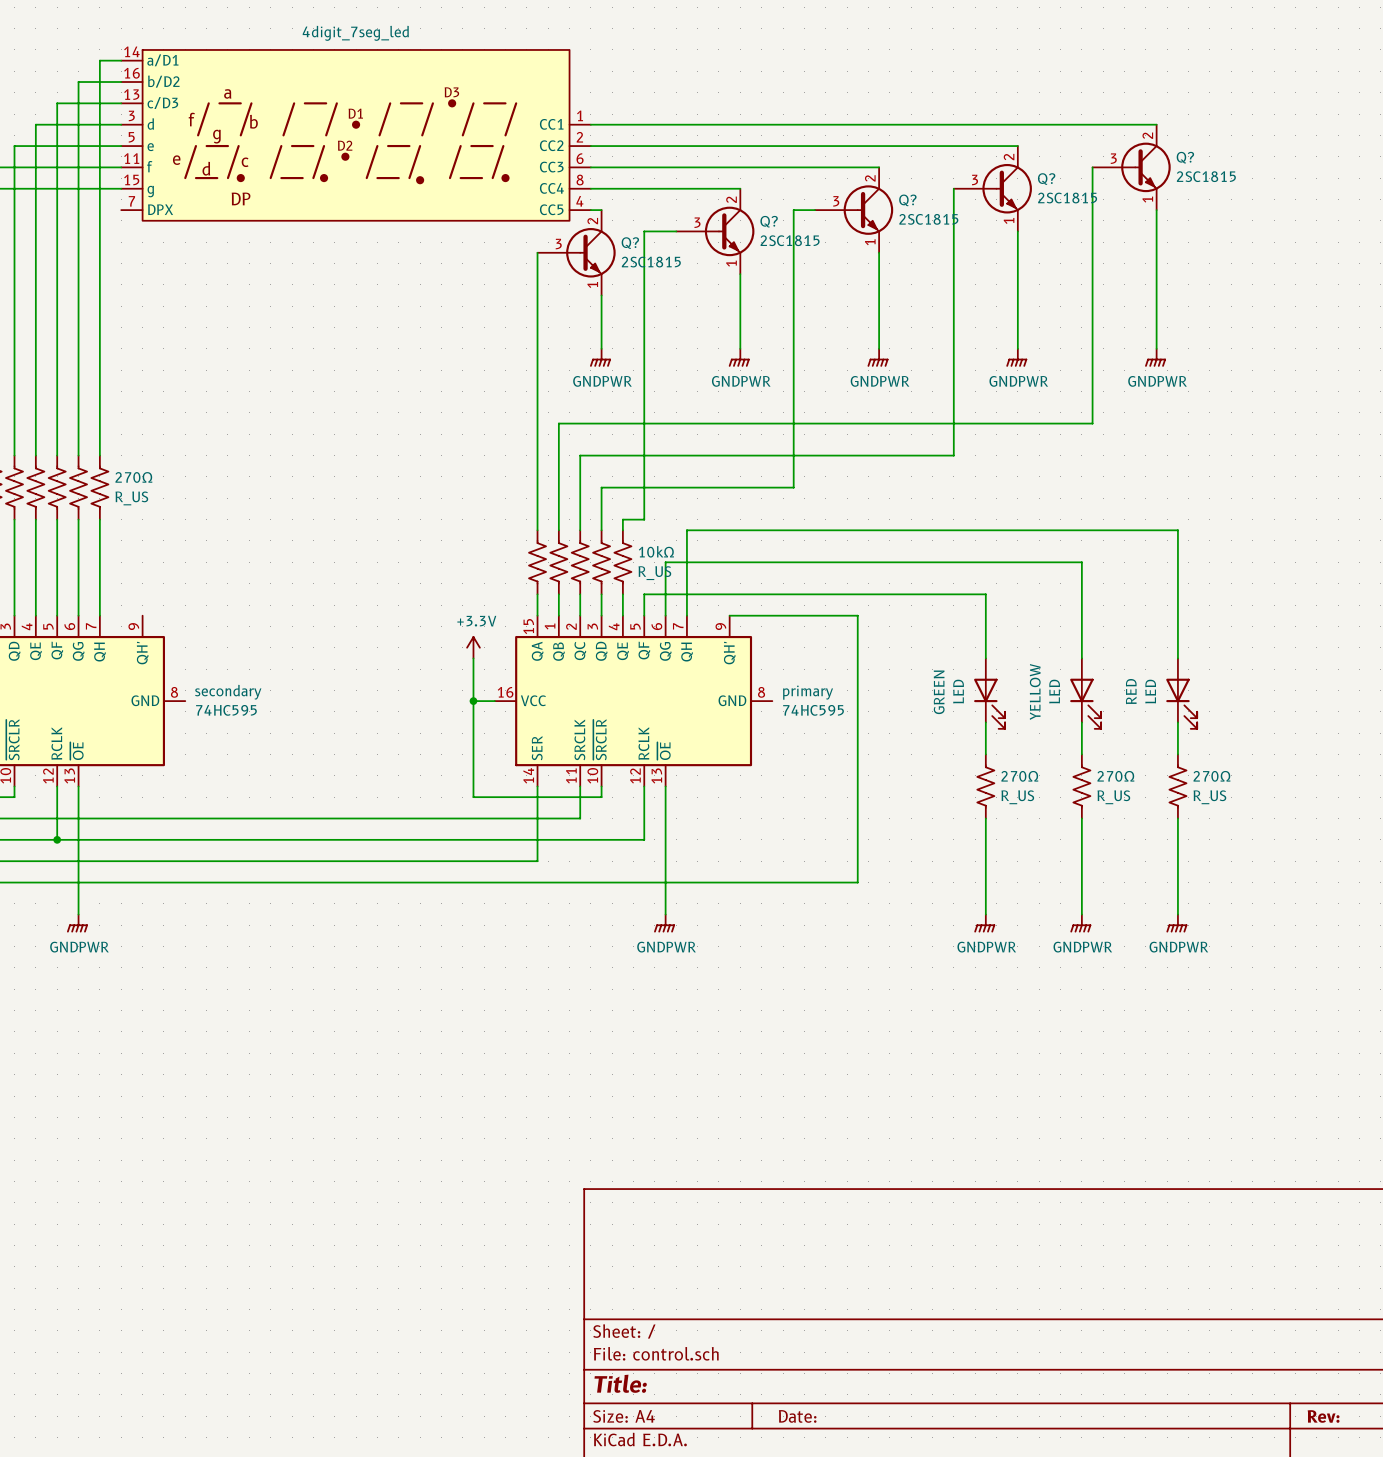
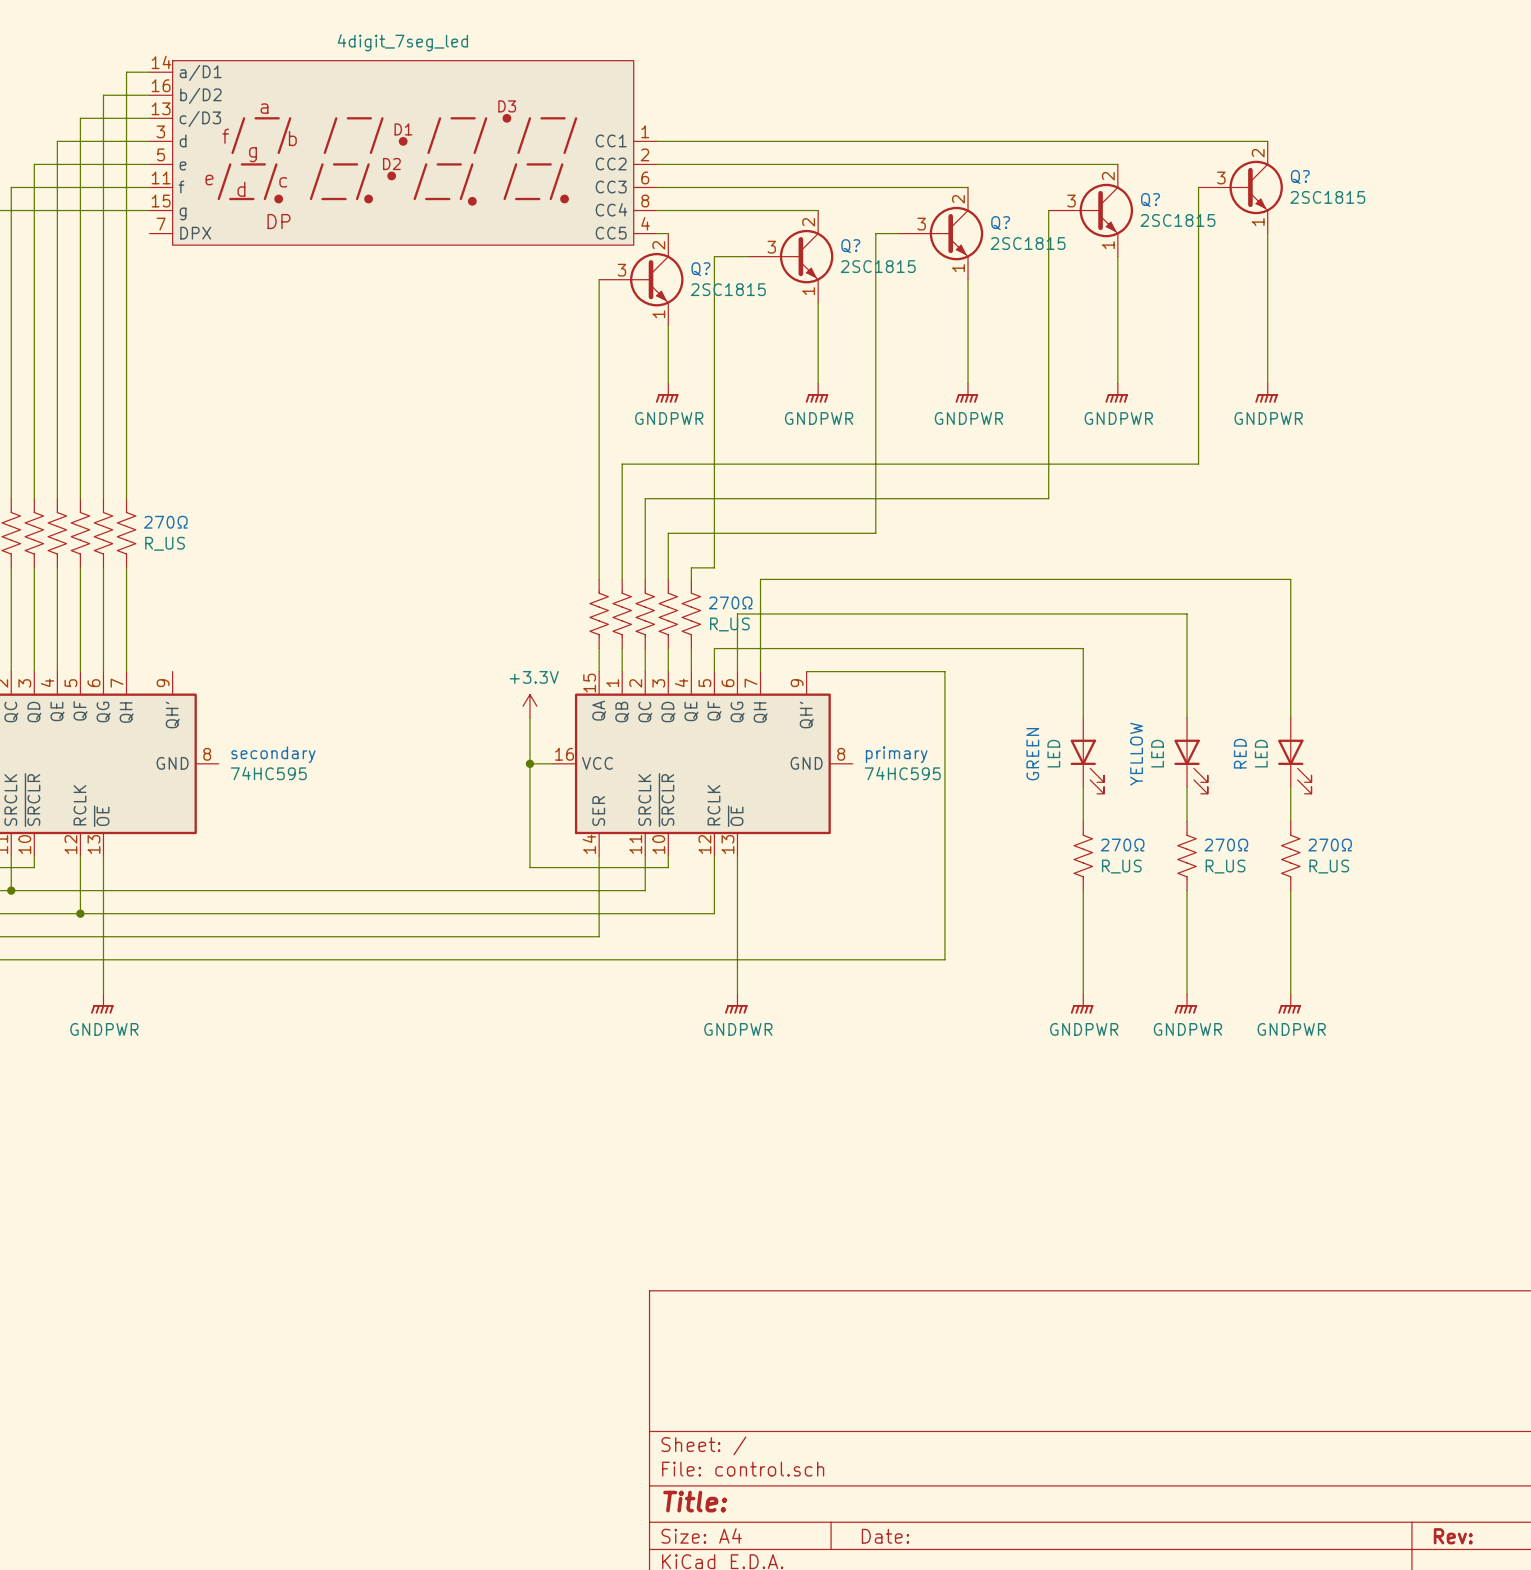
10kΩ name: 10kΩ (656, 551) -> 270Ω (730, 602)

